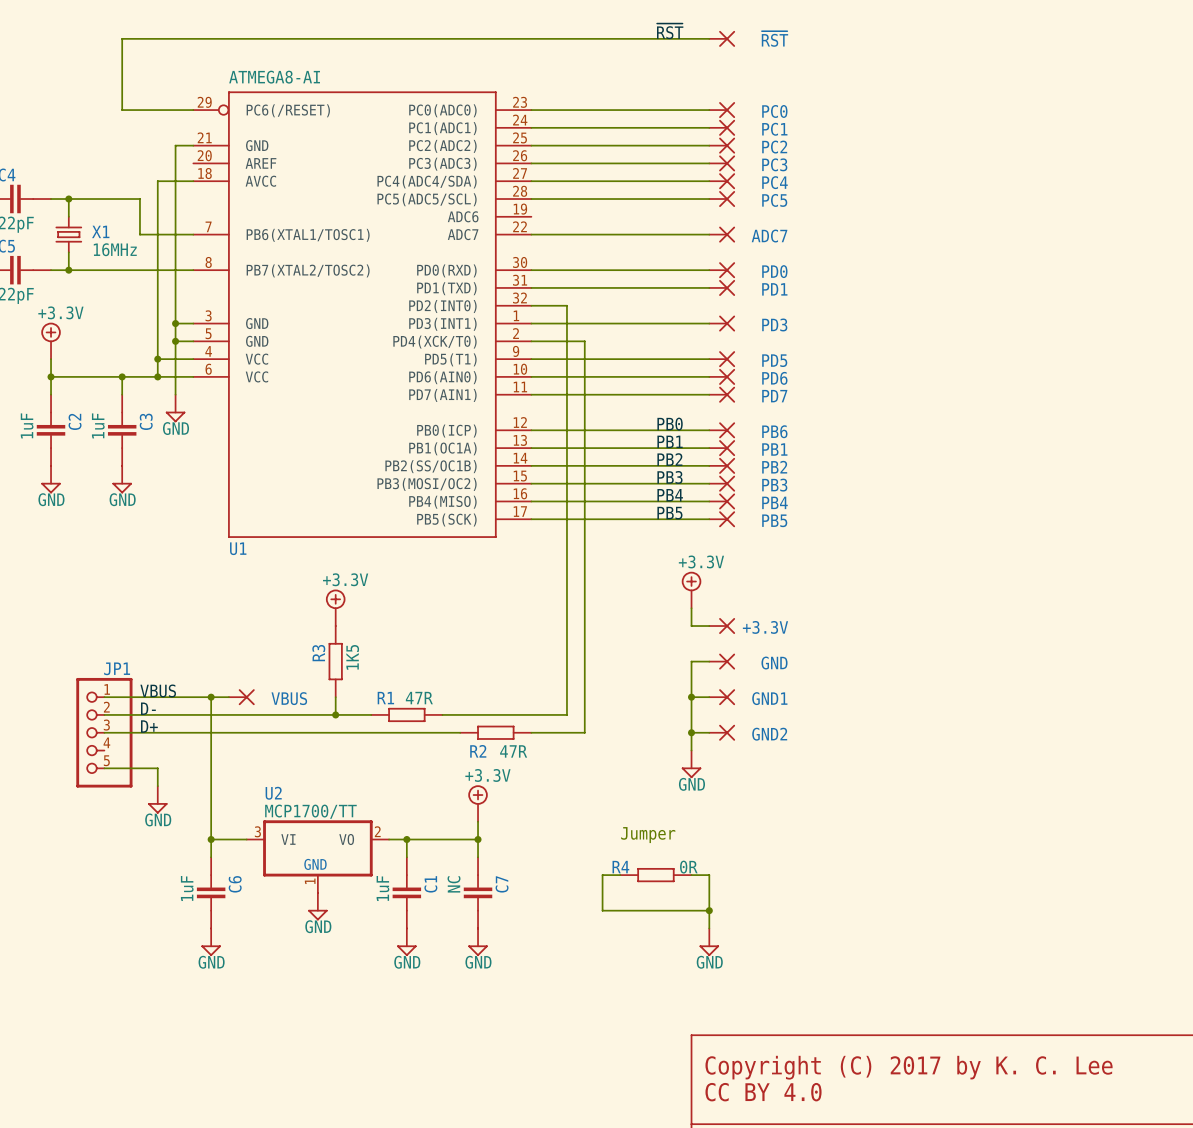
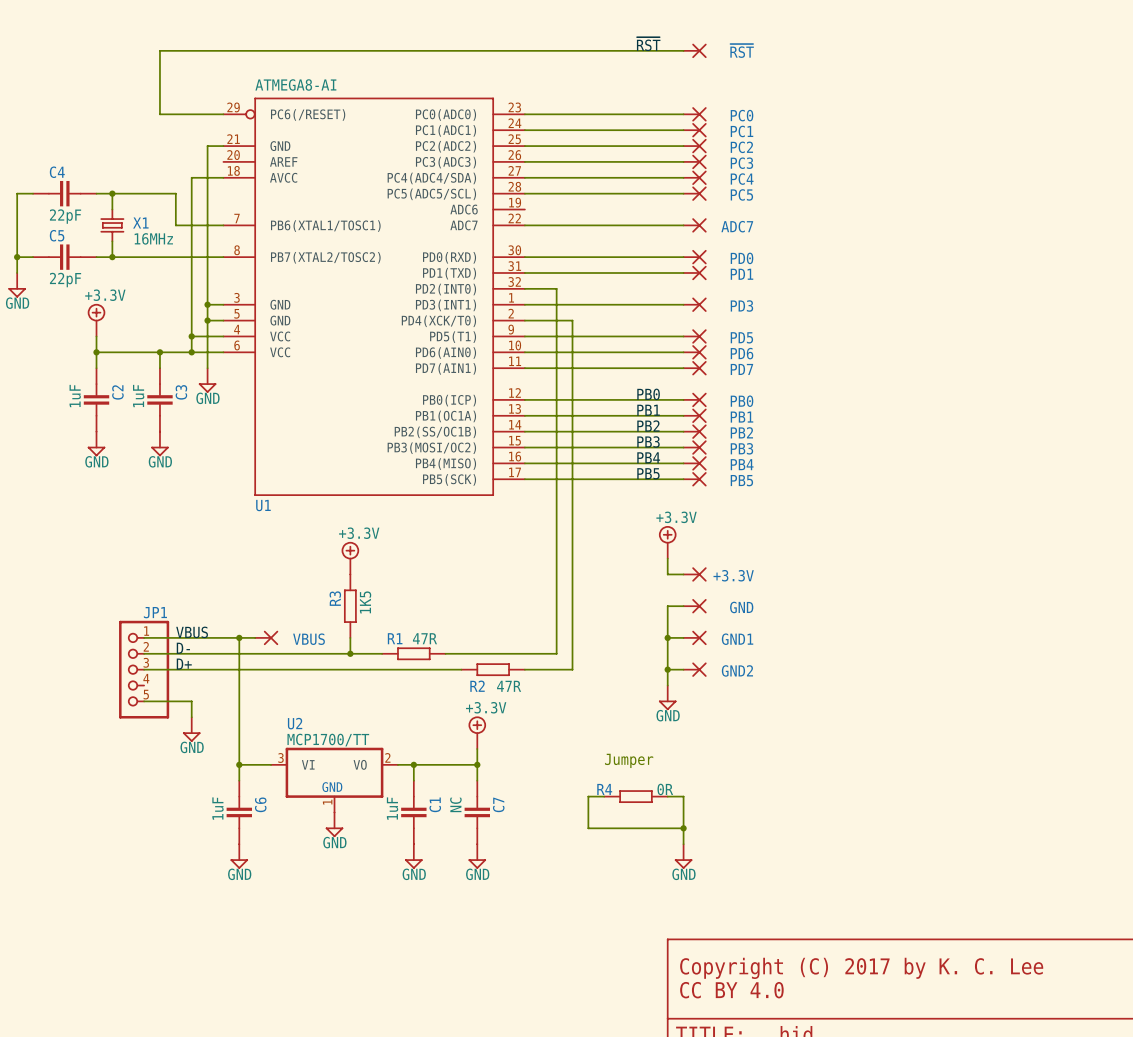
PB6 name: PB6 (774, 431) -> PB0 (742, 401)

